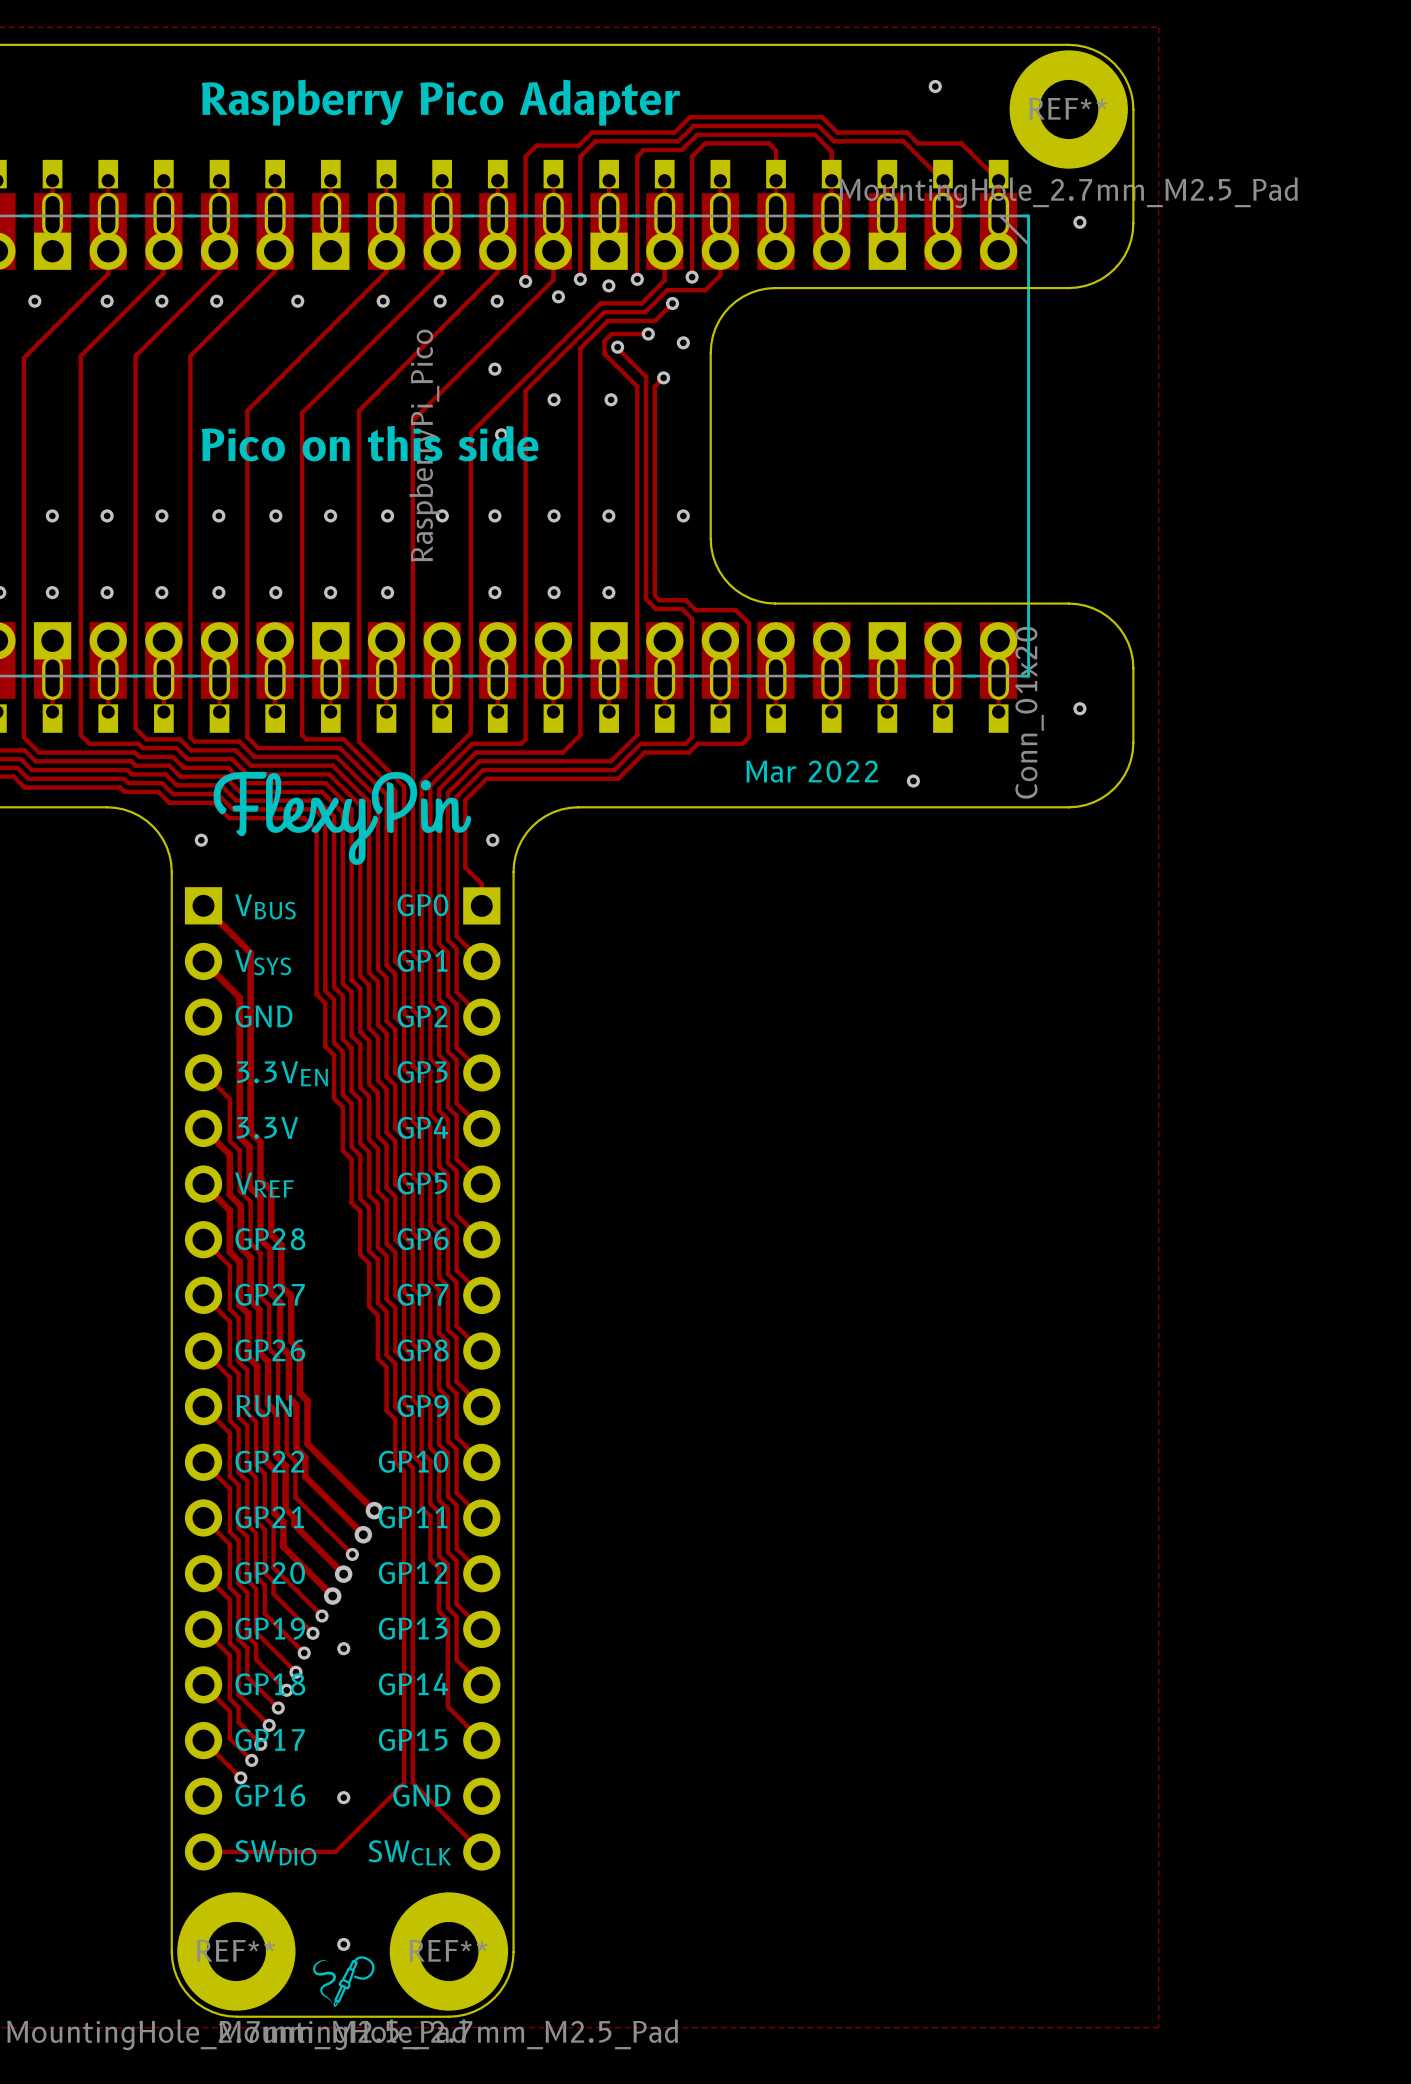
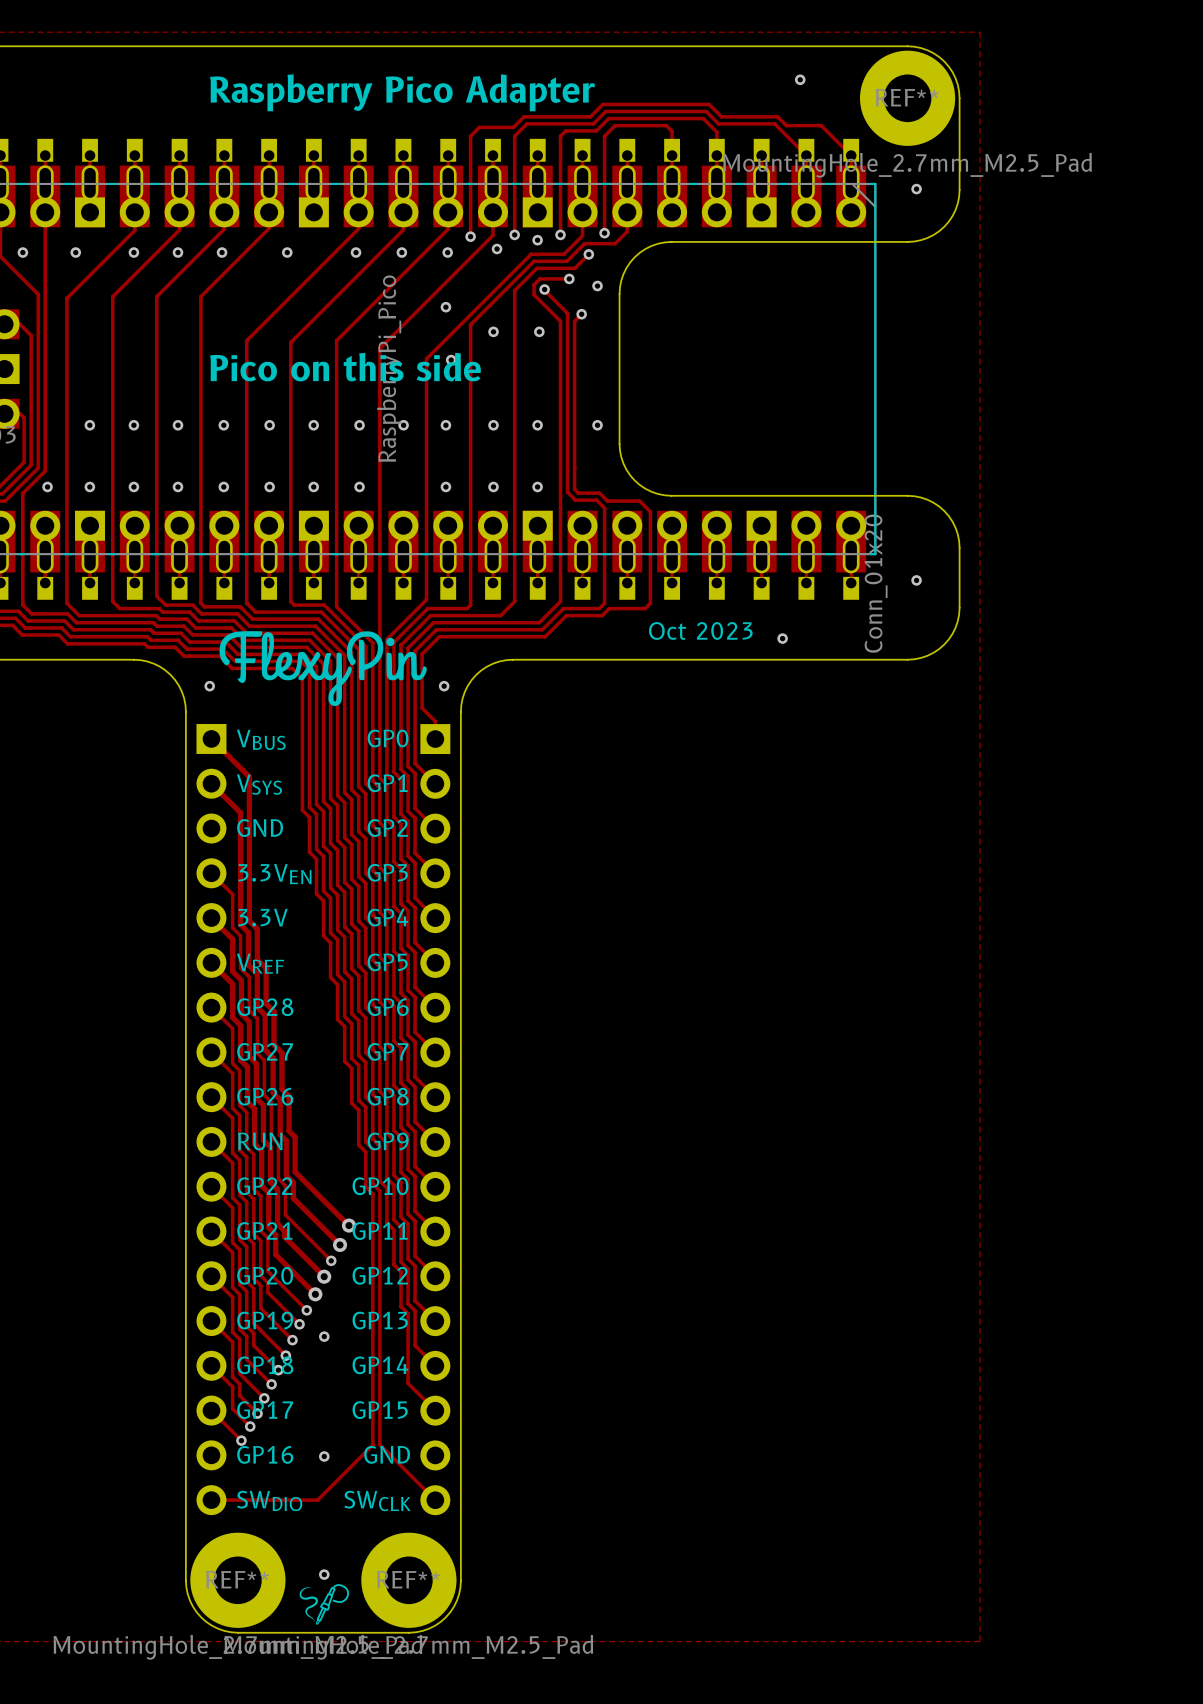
text: Mar 2022 (812, 771) -> Oct 2023 (700, 630)

